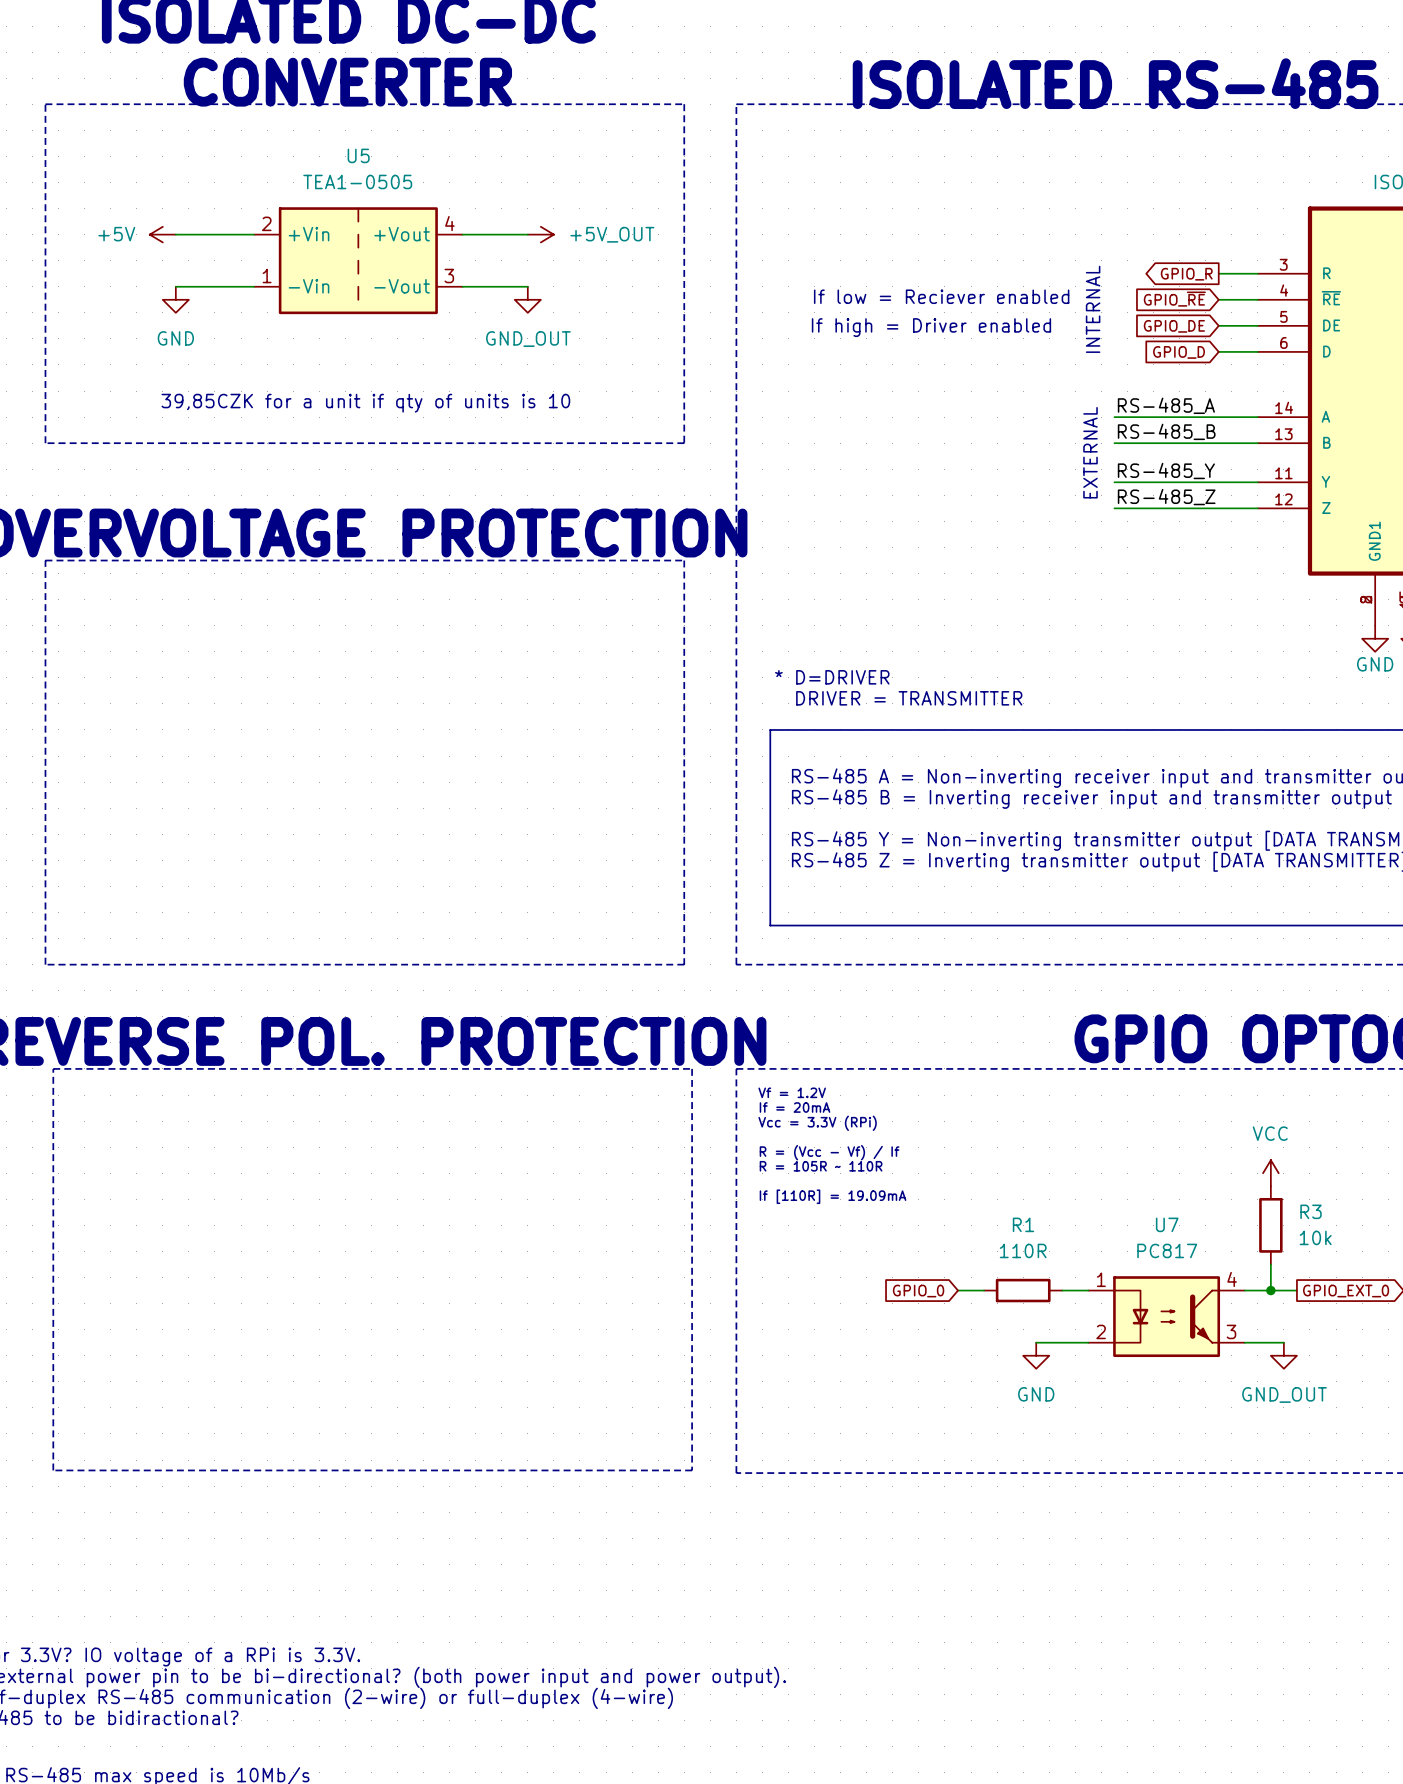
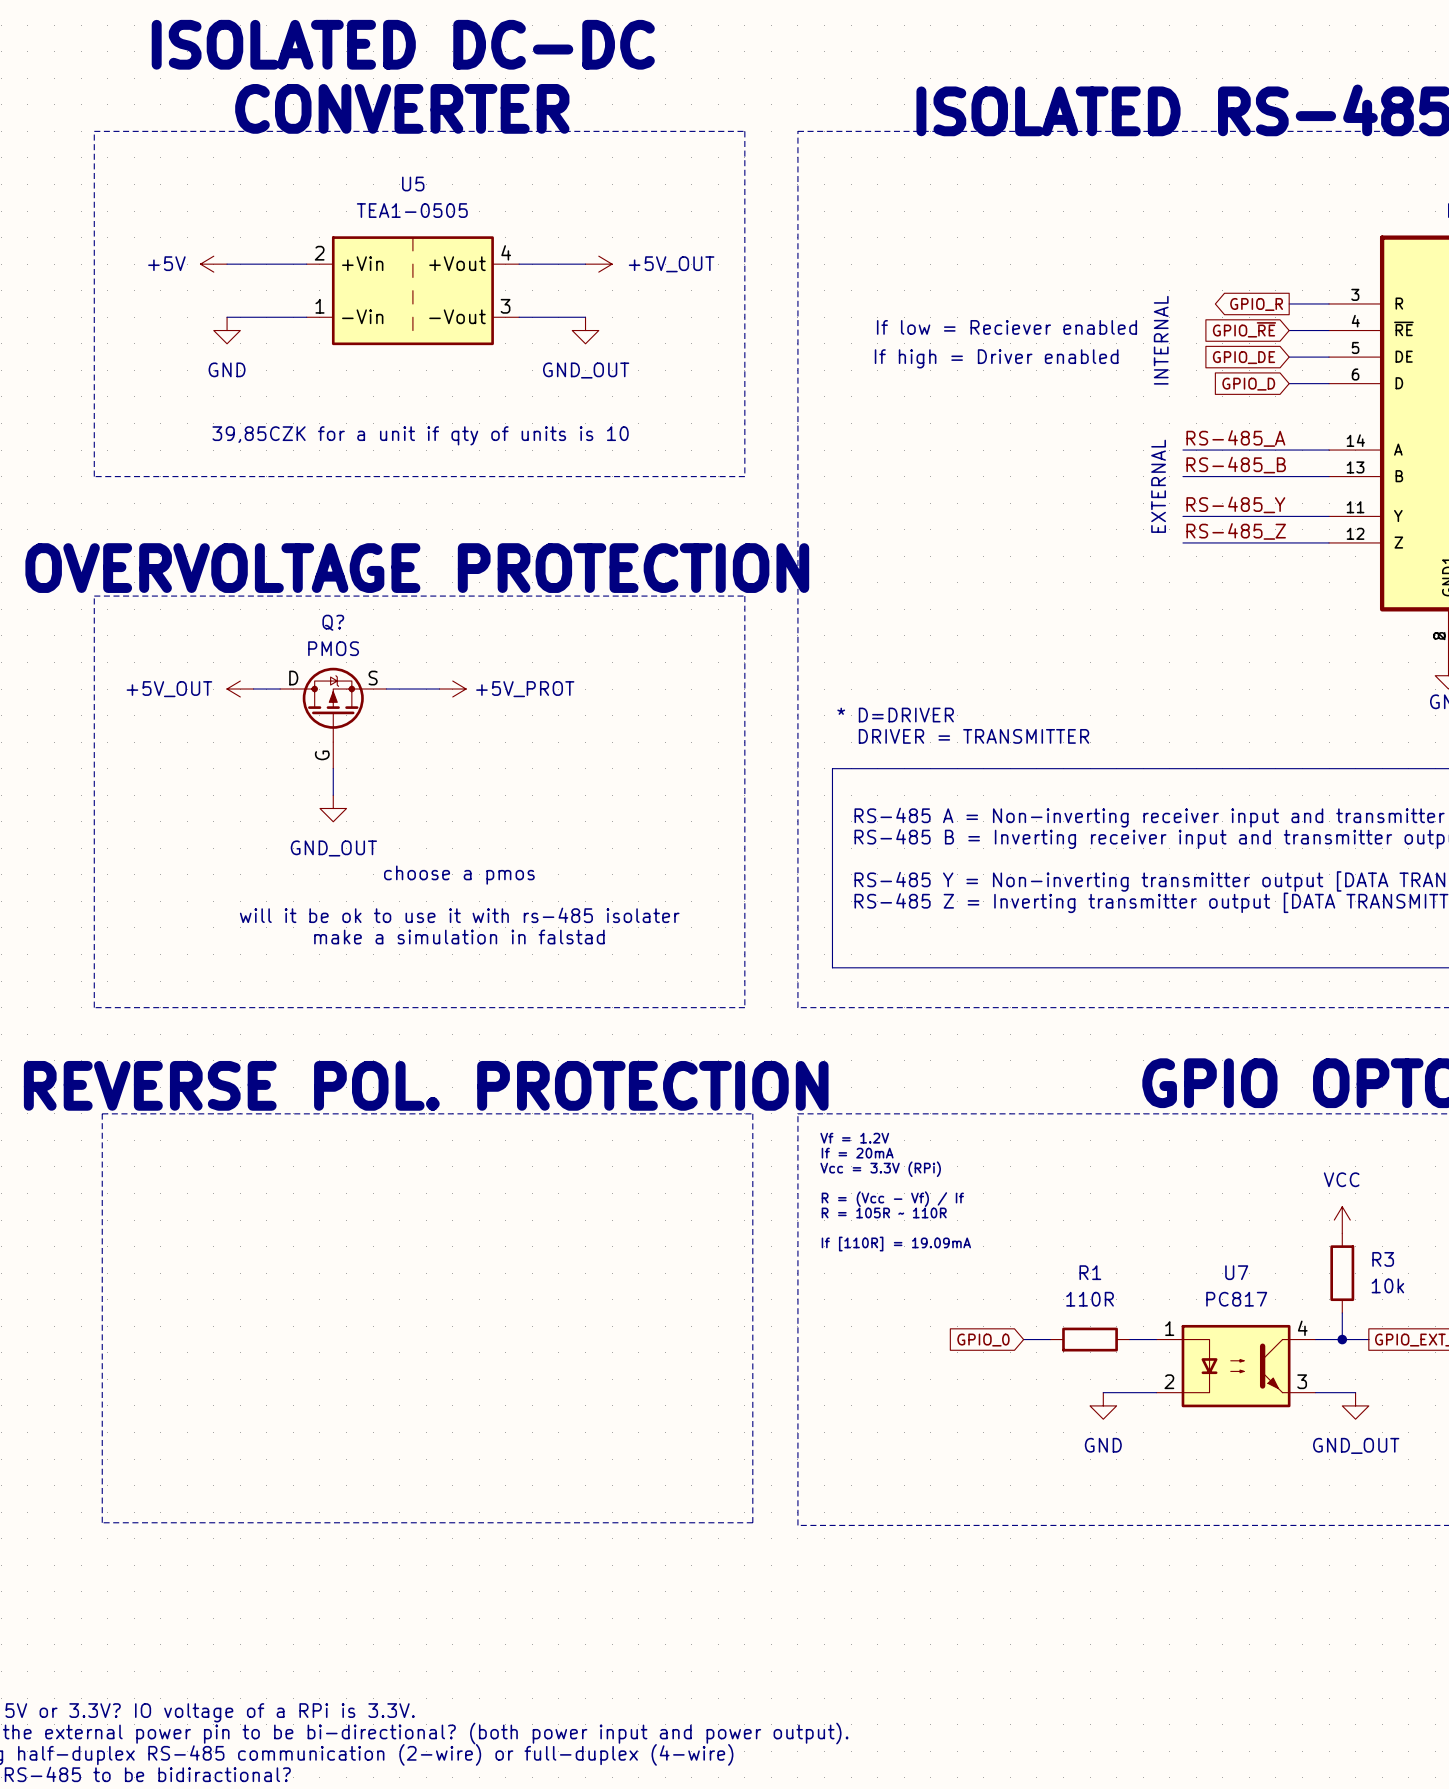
power symbol: none -> +5V_OUT (240, 689)
wire: none -> (253, 689) (280, 689)
wire: none -> (386, 689) (439, 689)
power symbol: none -> +5V_PROT (452, 689)
Q?: none -> PMOS (333, 718)
wire: none -> (333, 768) (333, 795)
power symbol: none -> GND_OUT (333, 808)
text: none -> choose a pmos (459, 875)
text: none -> will it be ok to use it with rs-485 isolater (459, 915)
text: none -> make a simulation in falstad (459, 937)

